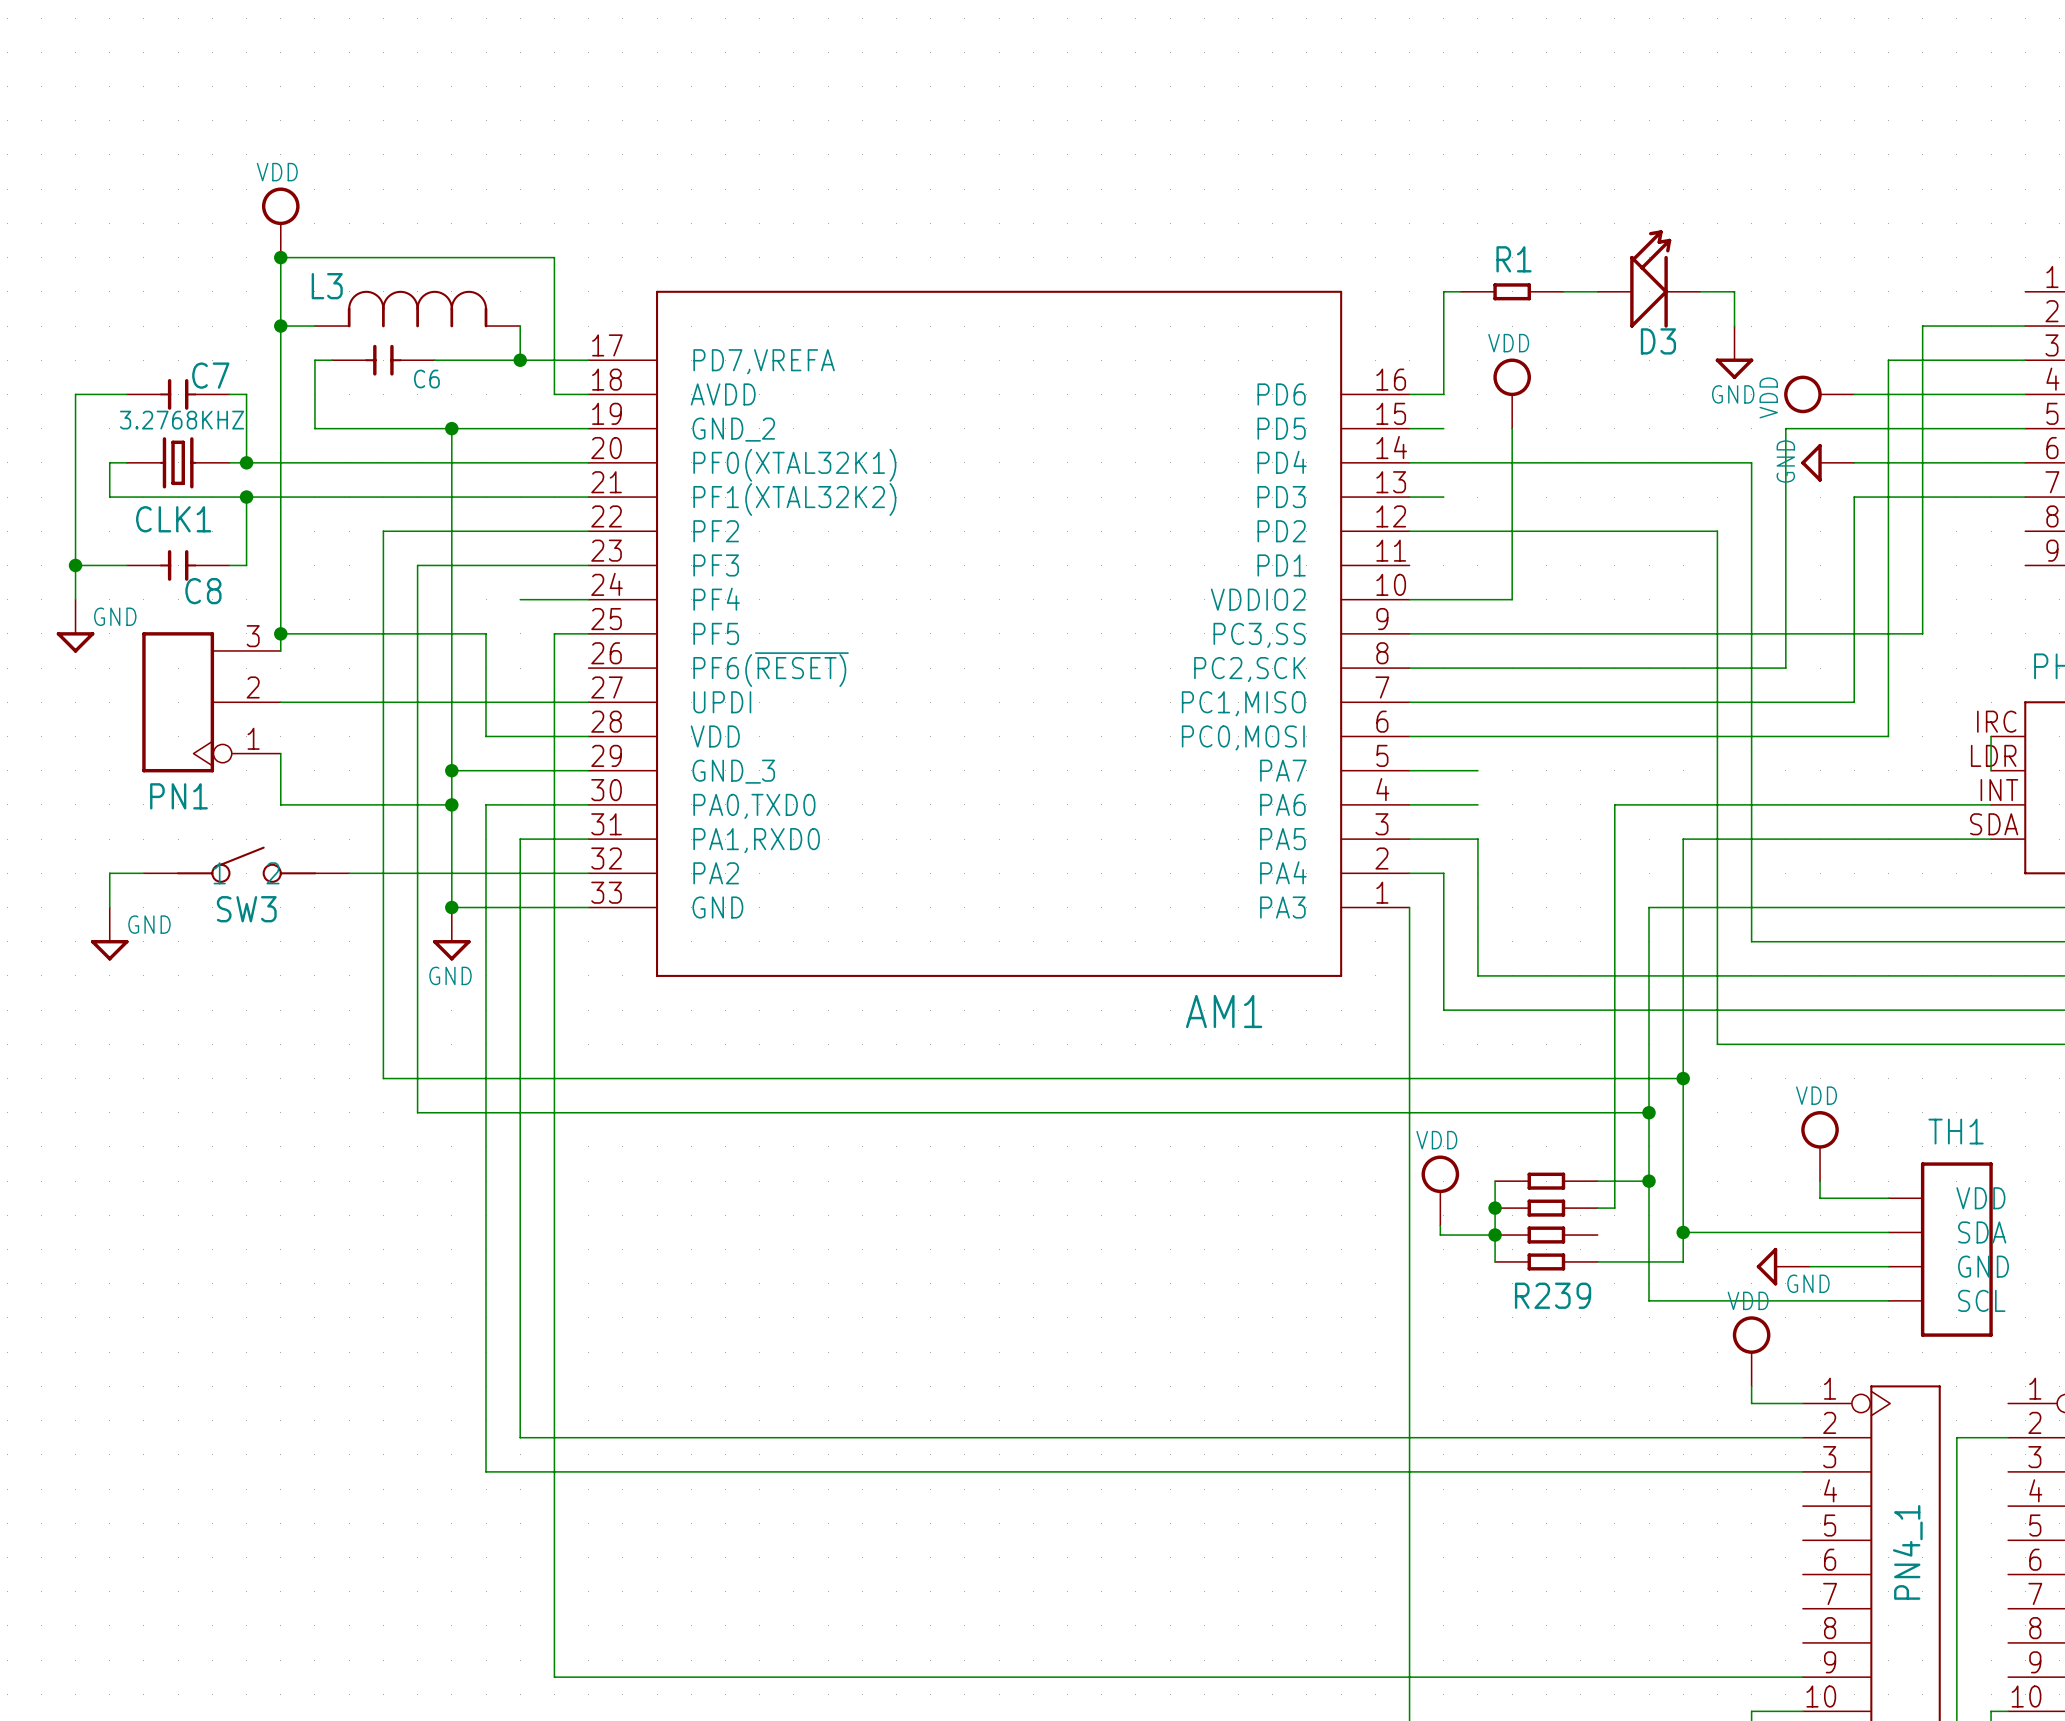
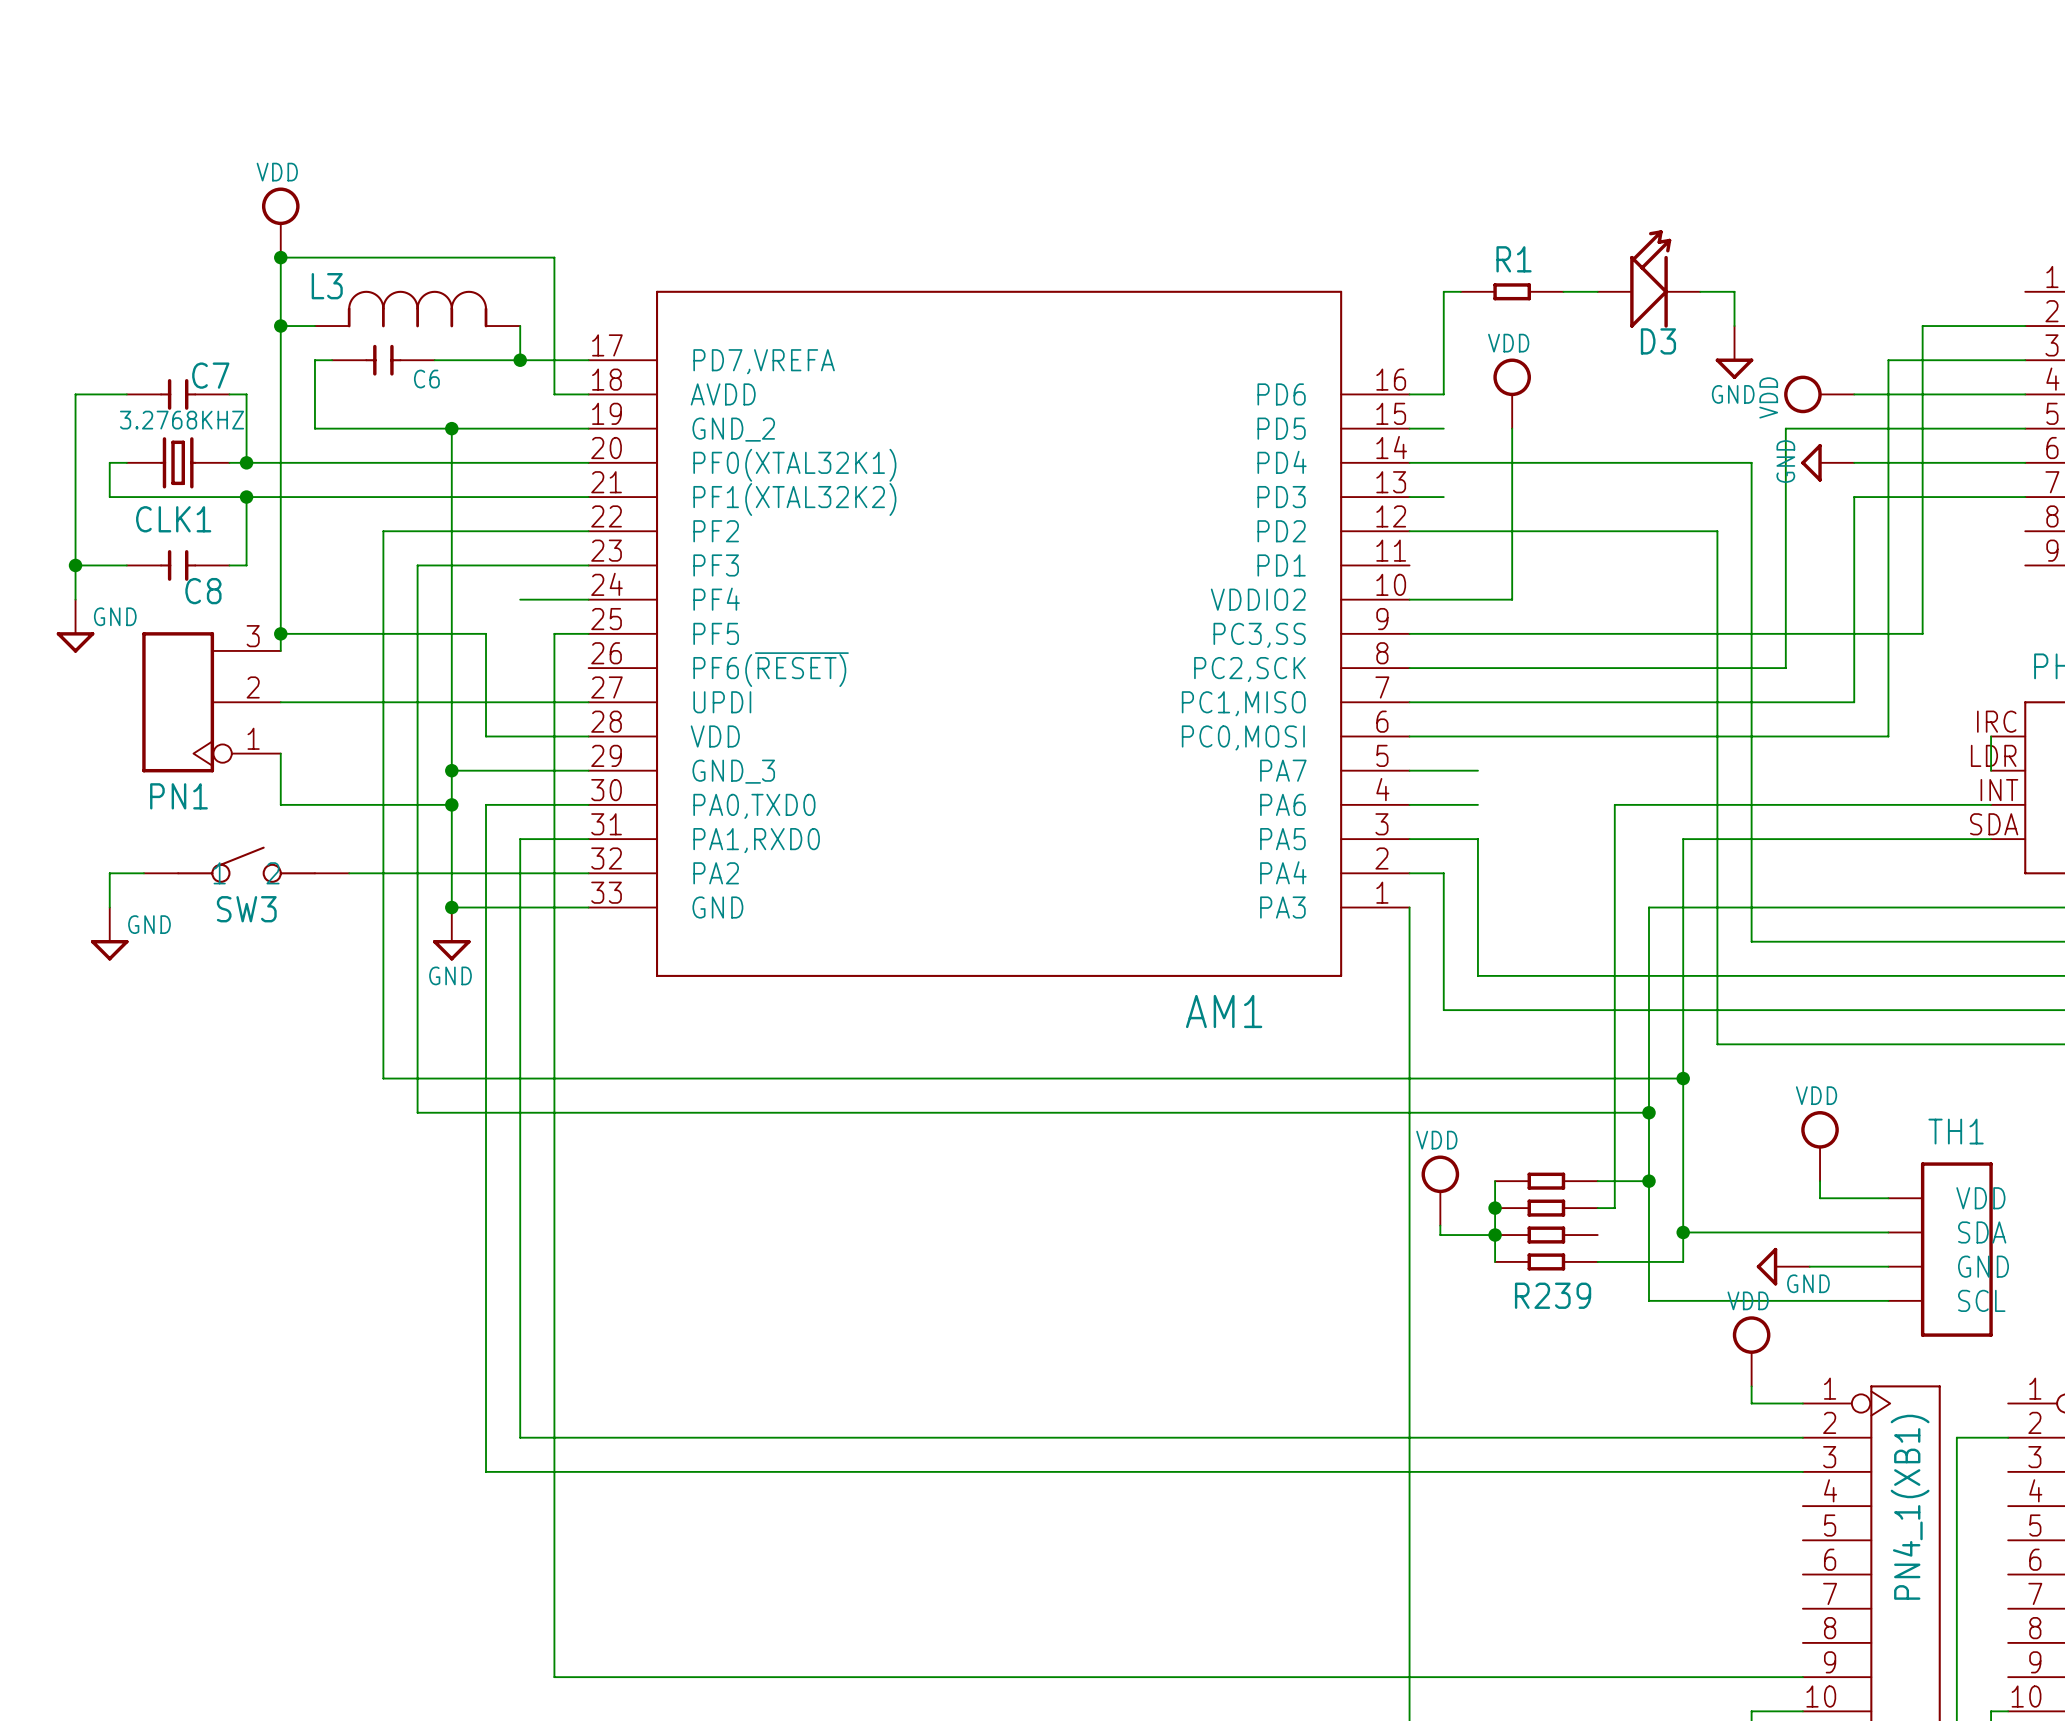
PN4_1 name: PN4_1 (1907, 1552) -> PN4_1(XB1) (1910, 1507)

